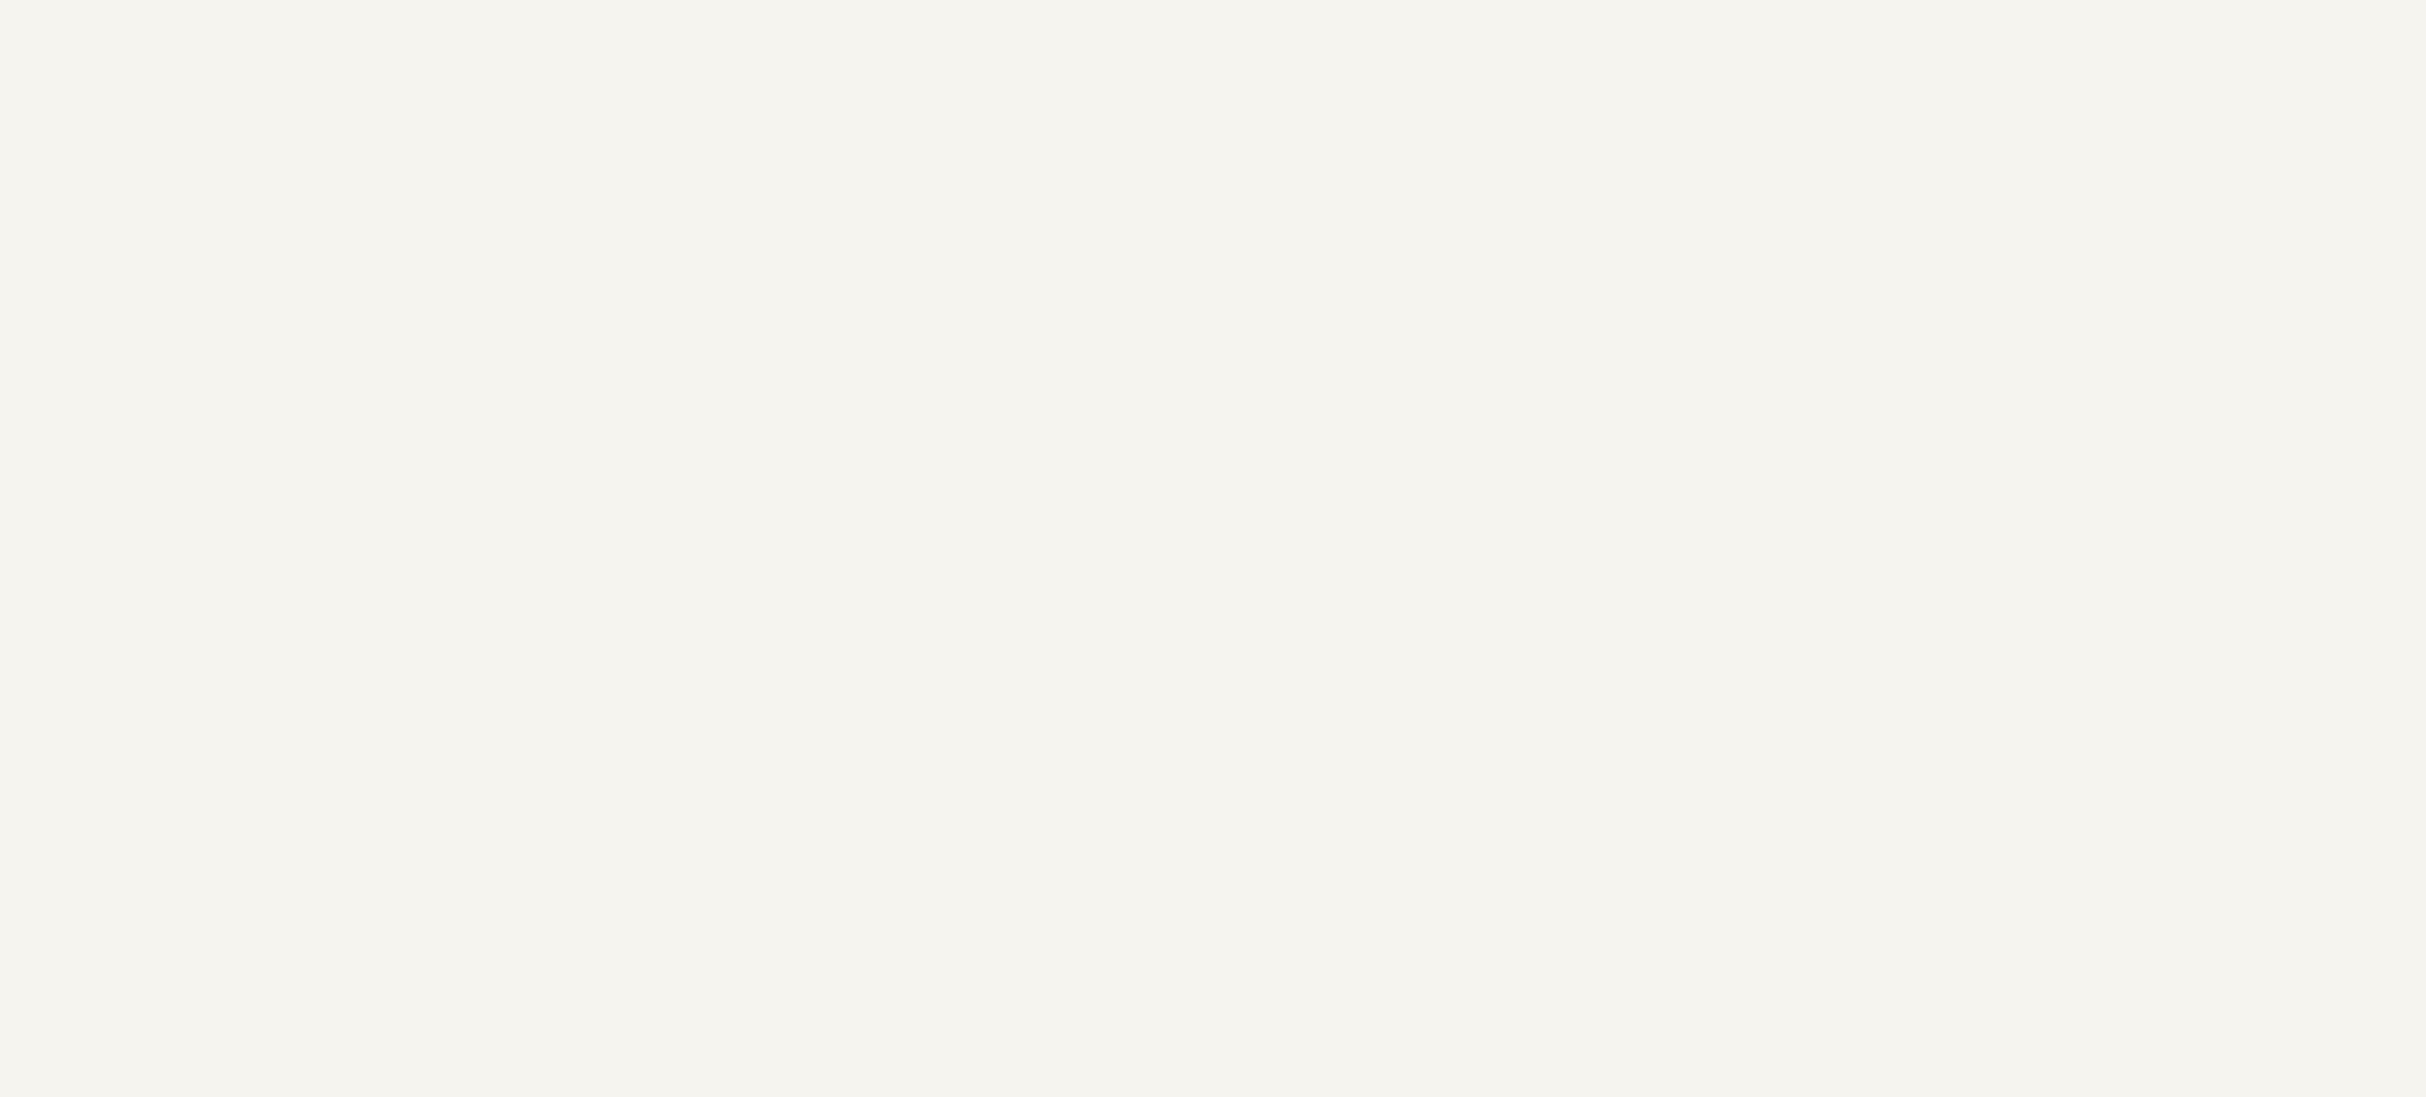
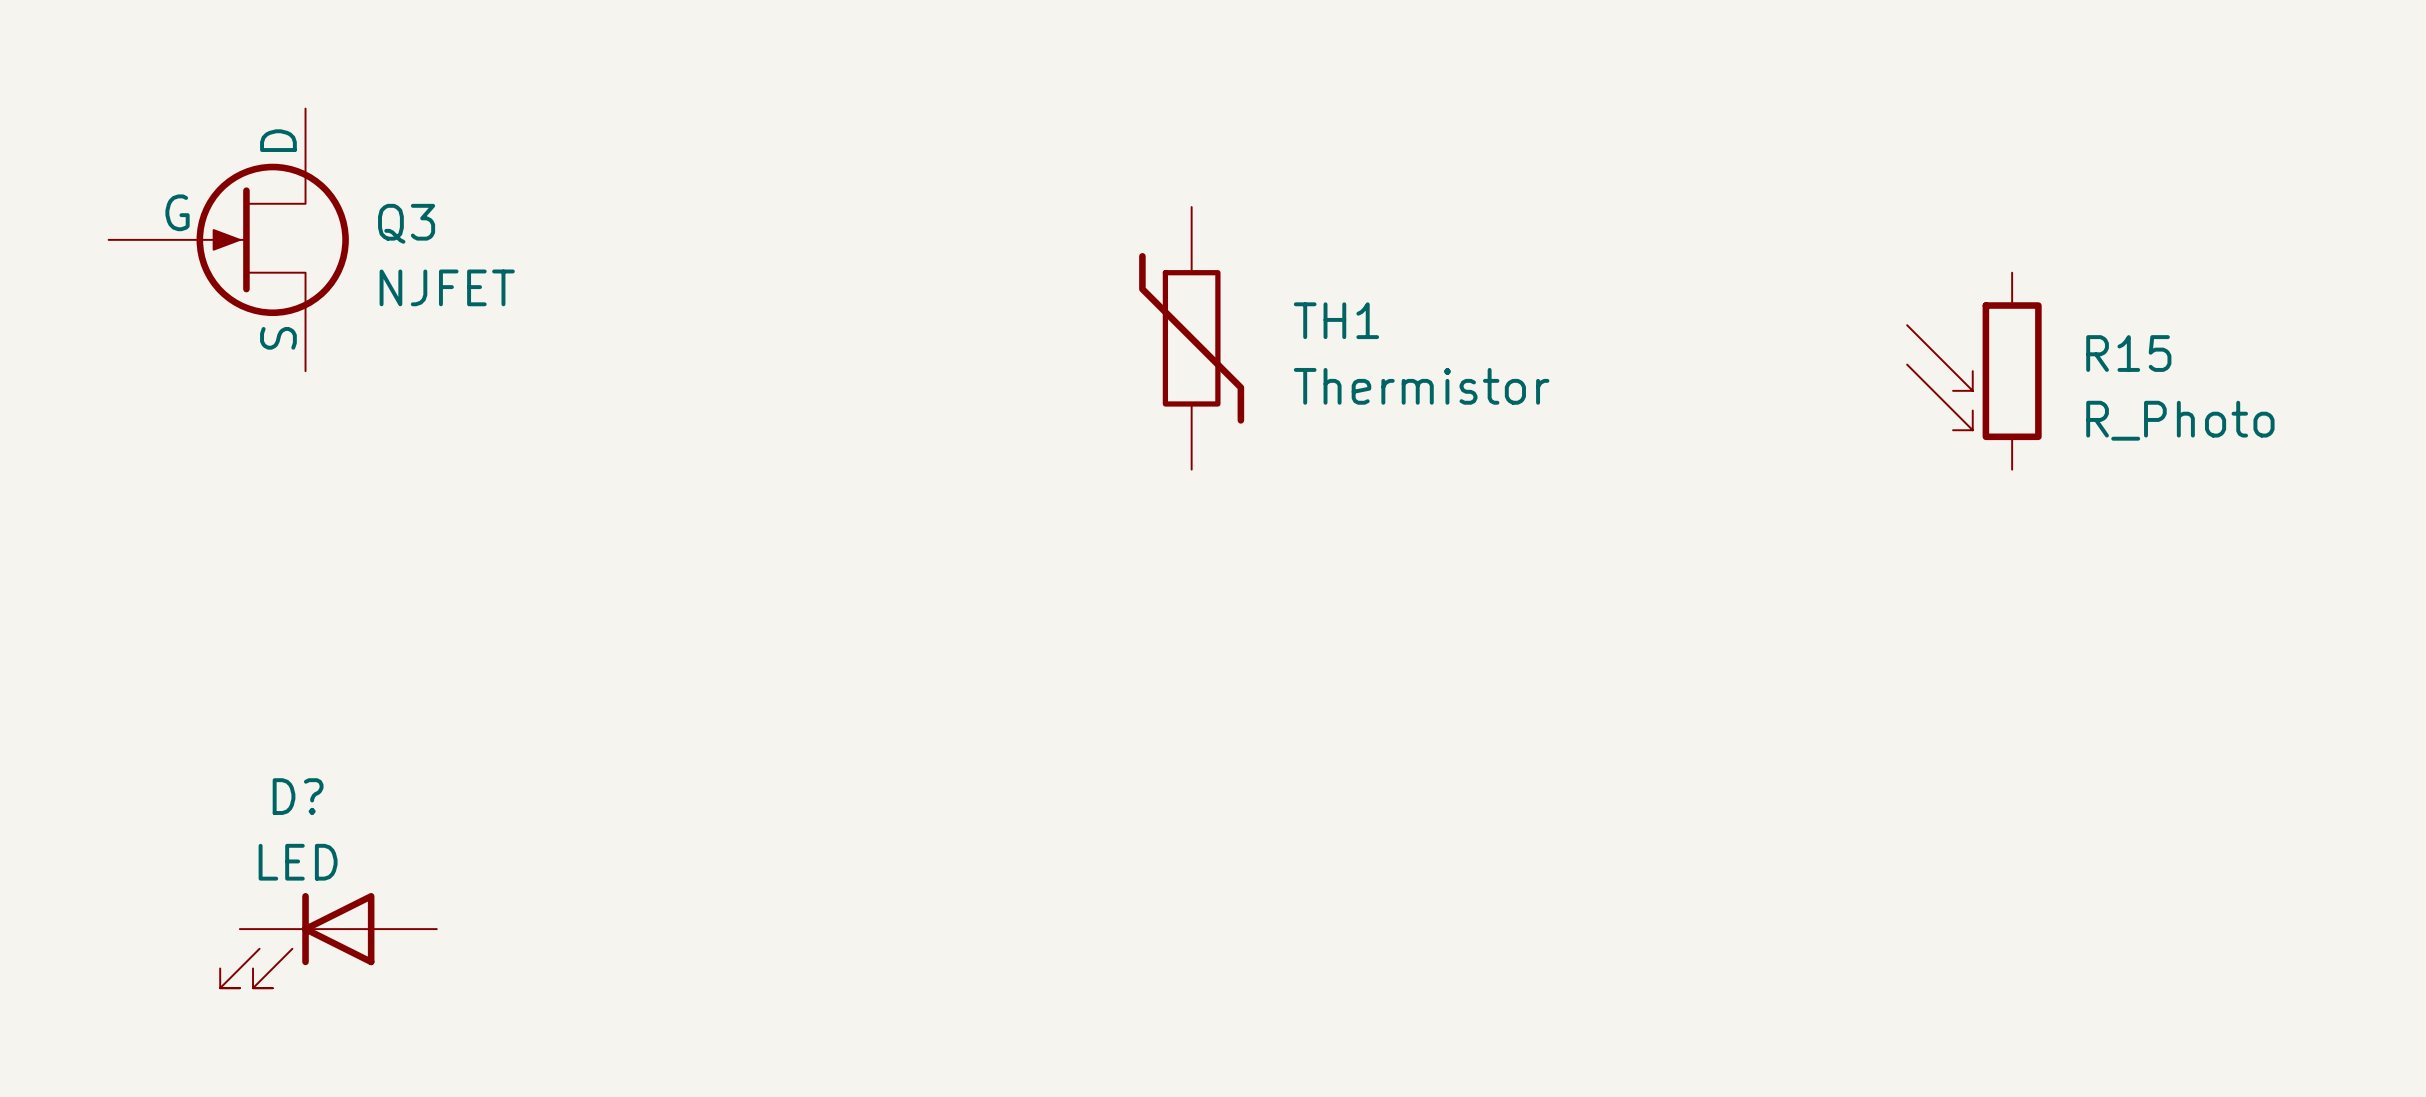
Q3: none -> NJFET (228, 239)
TH1: none -> Thermistor (1191, 338)
R15: none -> R_Photo (1974, 371)
D?: none -> LED (328, 940)

